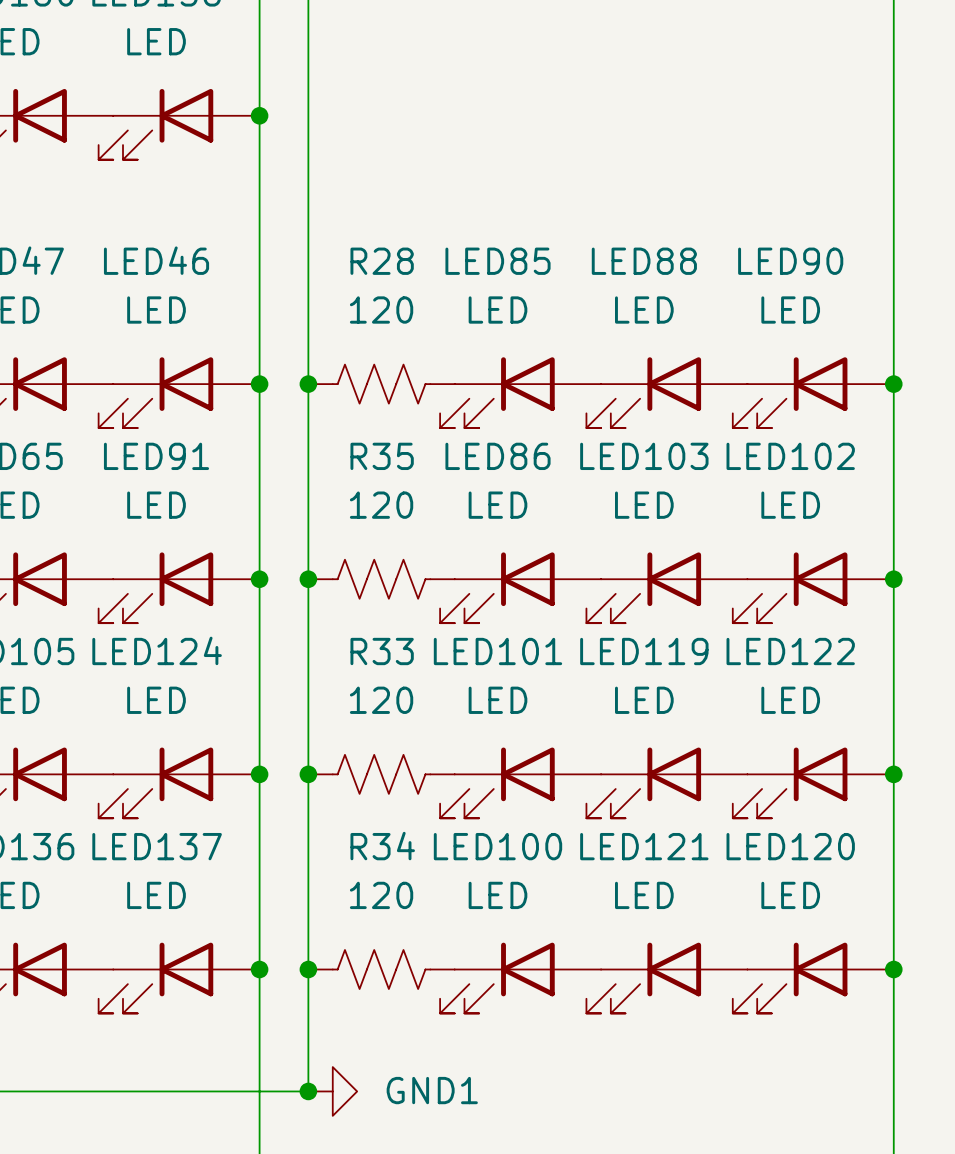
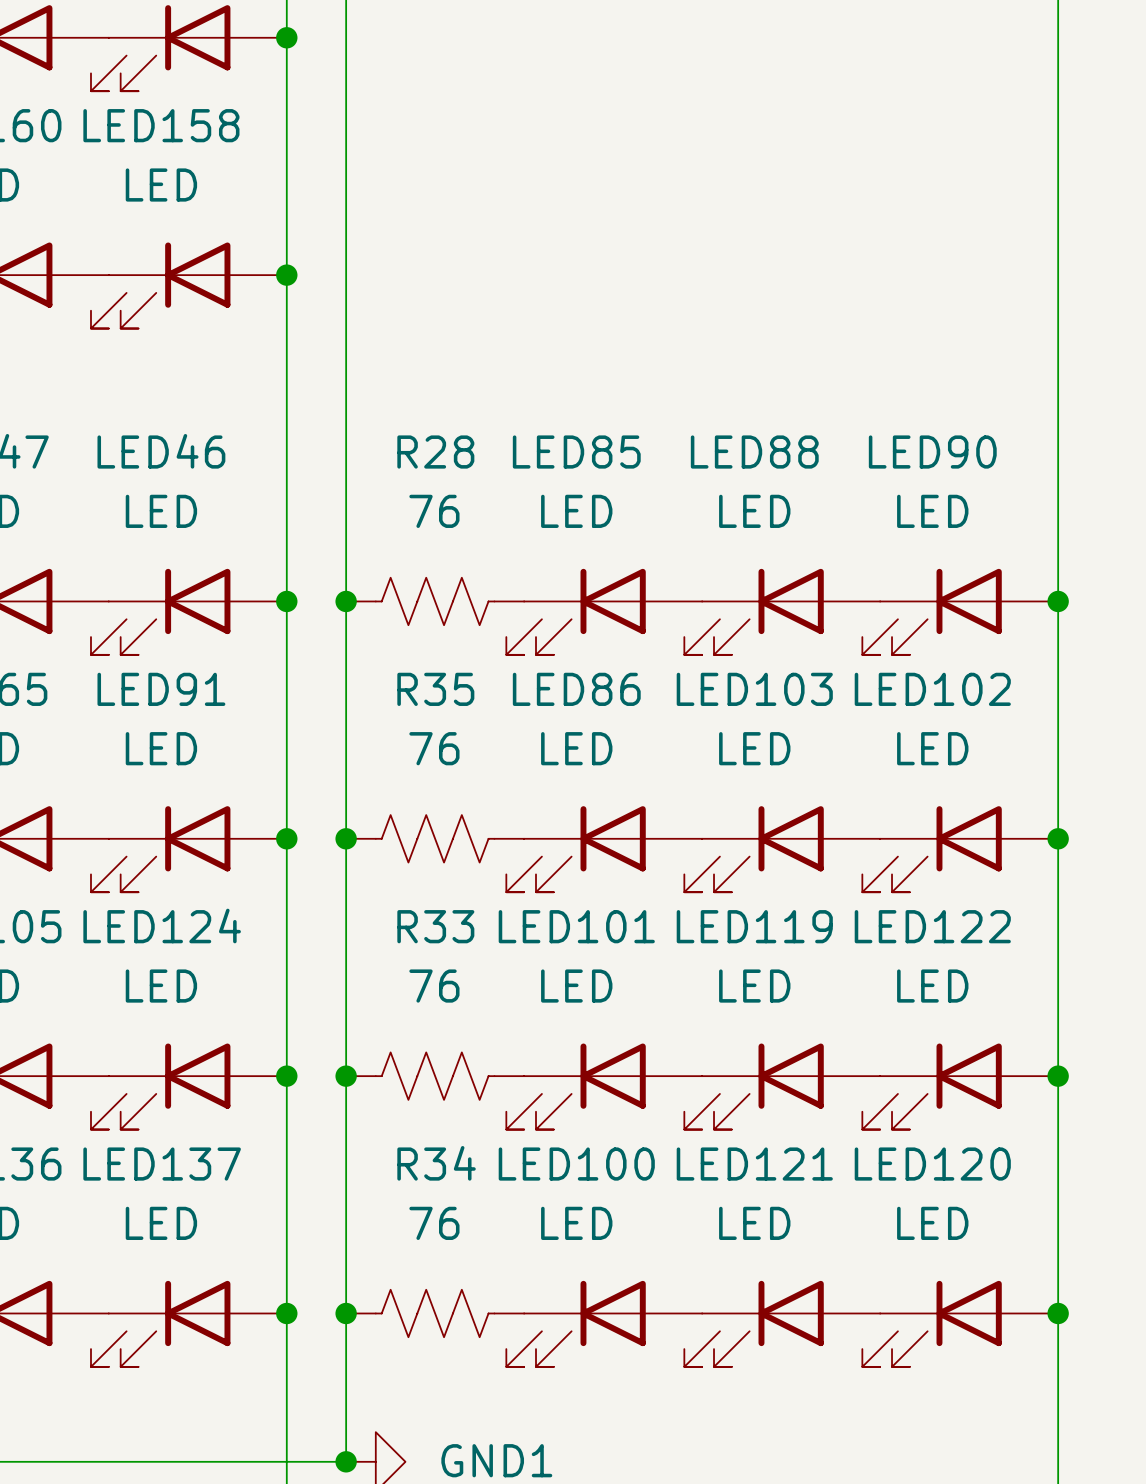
R28 value: 120 (381, 310) -> 76 (434, 511)
R35 value: 120 (381, 505) -> 76 (434, 748)
R33 value: 120 (381, 700) -> 76 (434, 986)
R34 value: 120 (381, 895) -> 76 (434, 1223)

